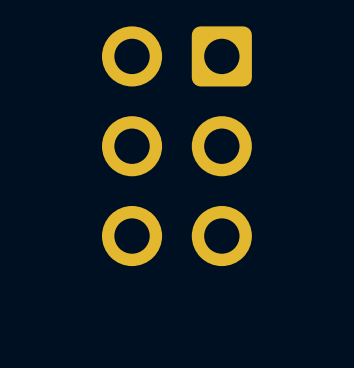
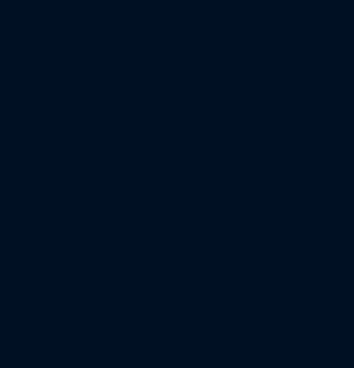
part: (176, 146) -> none

